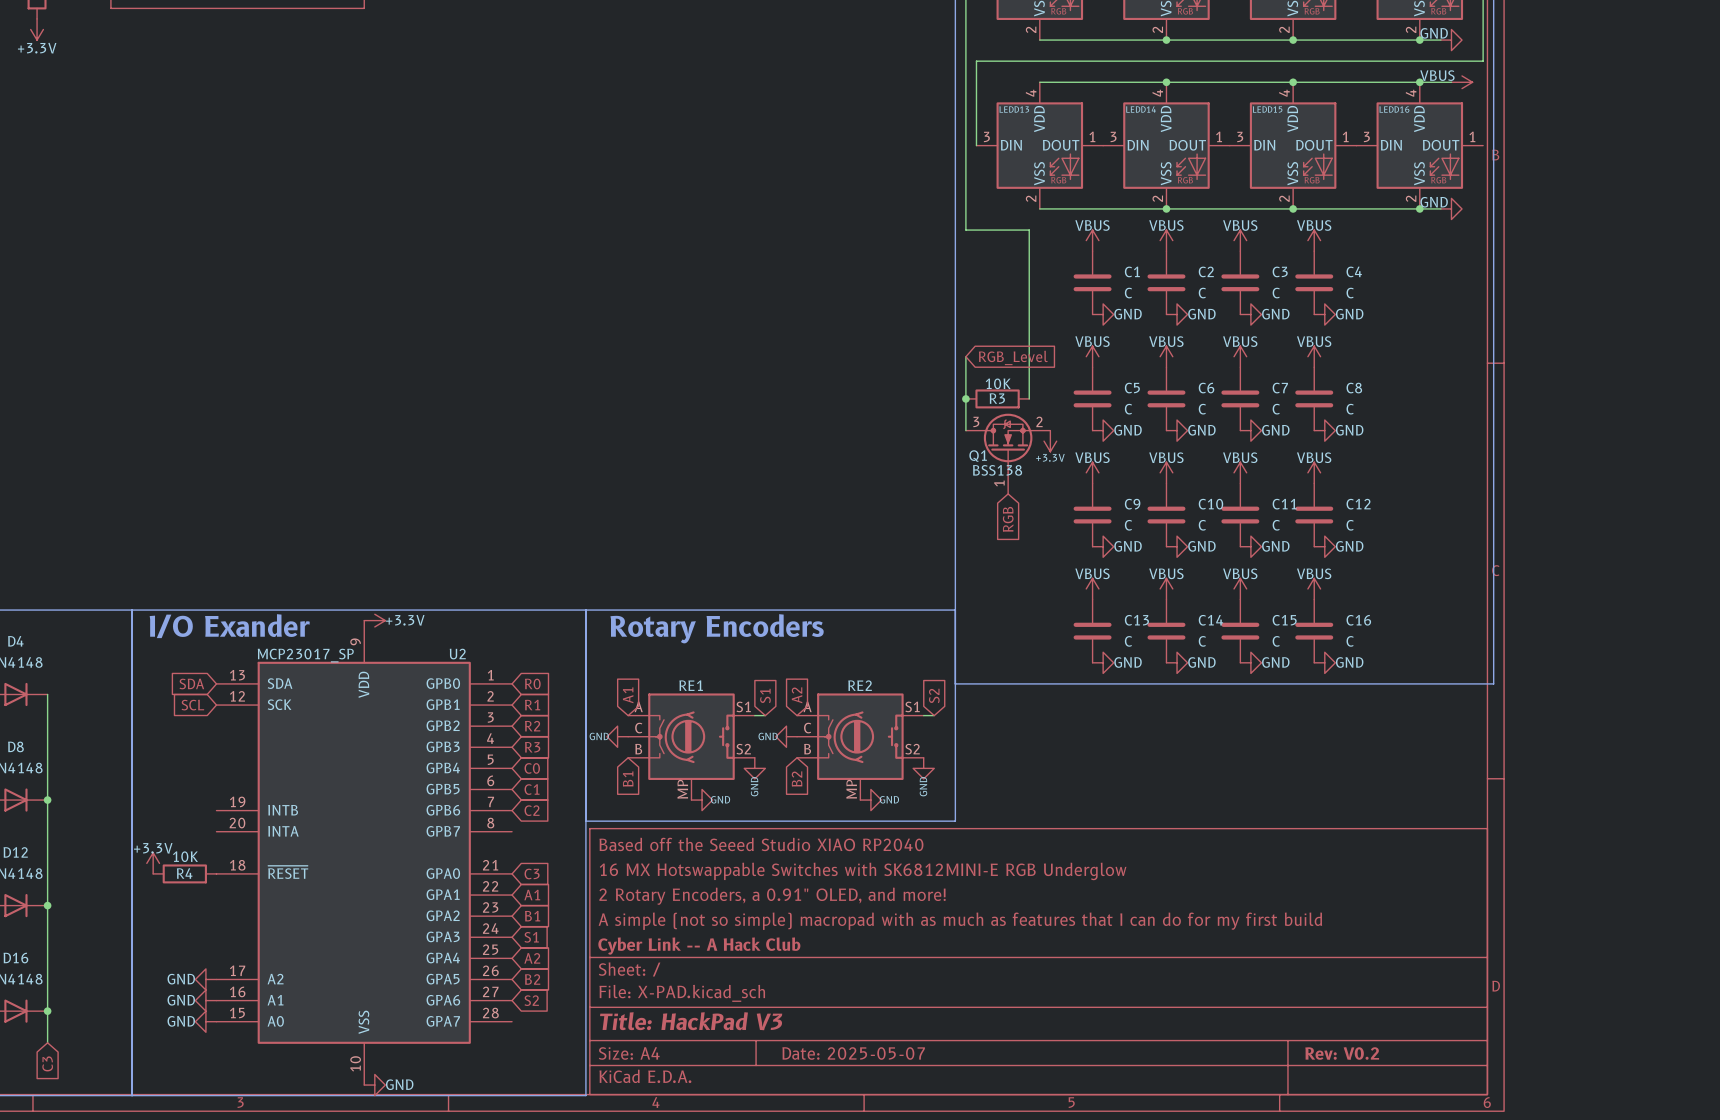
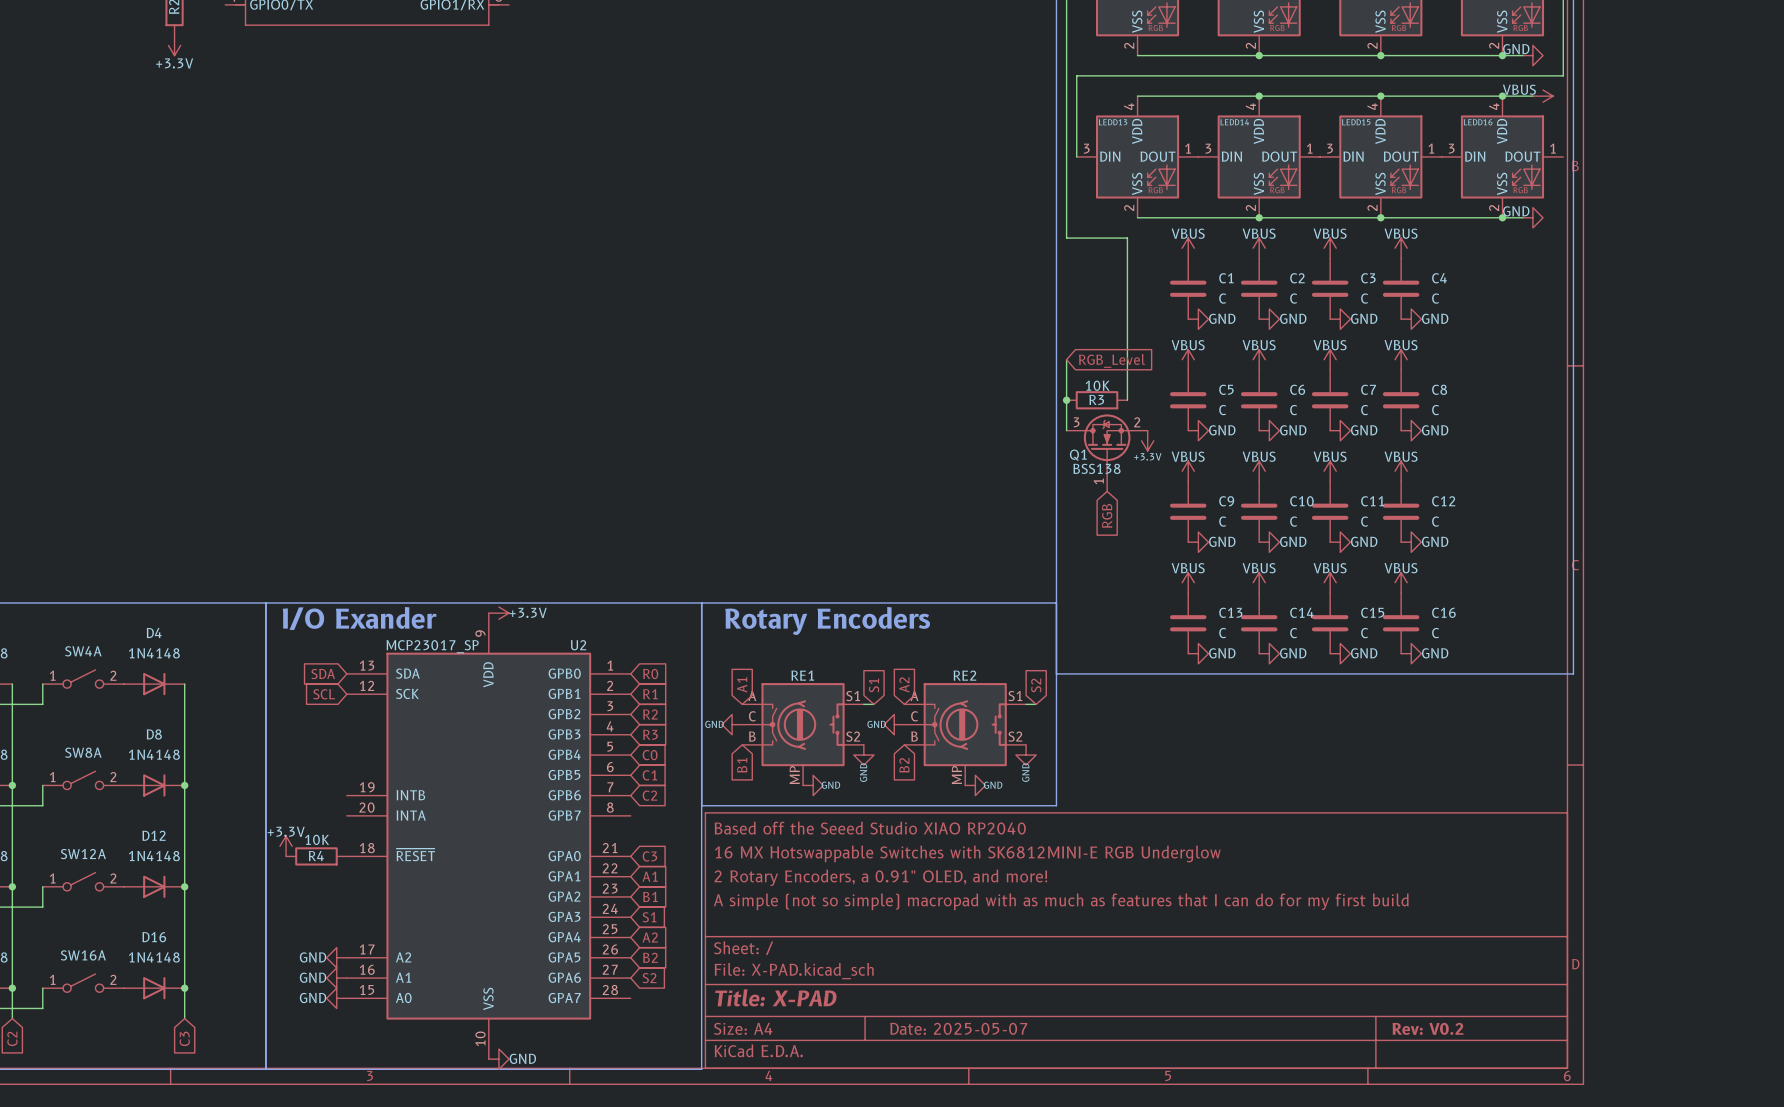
title block: Cyber Link -- A Hack Club (699, 946) -> none
title block: Title: HackPad V3 (691, 1021) -> Title: X-PAD (775, 997)

